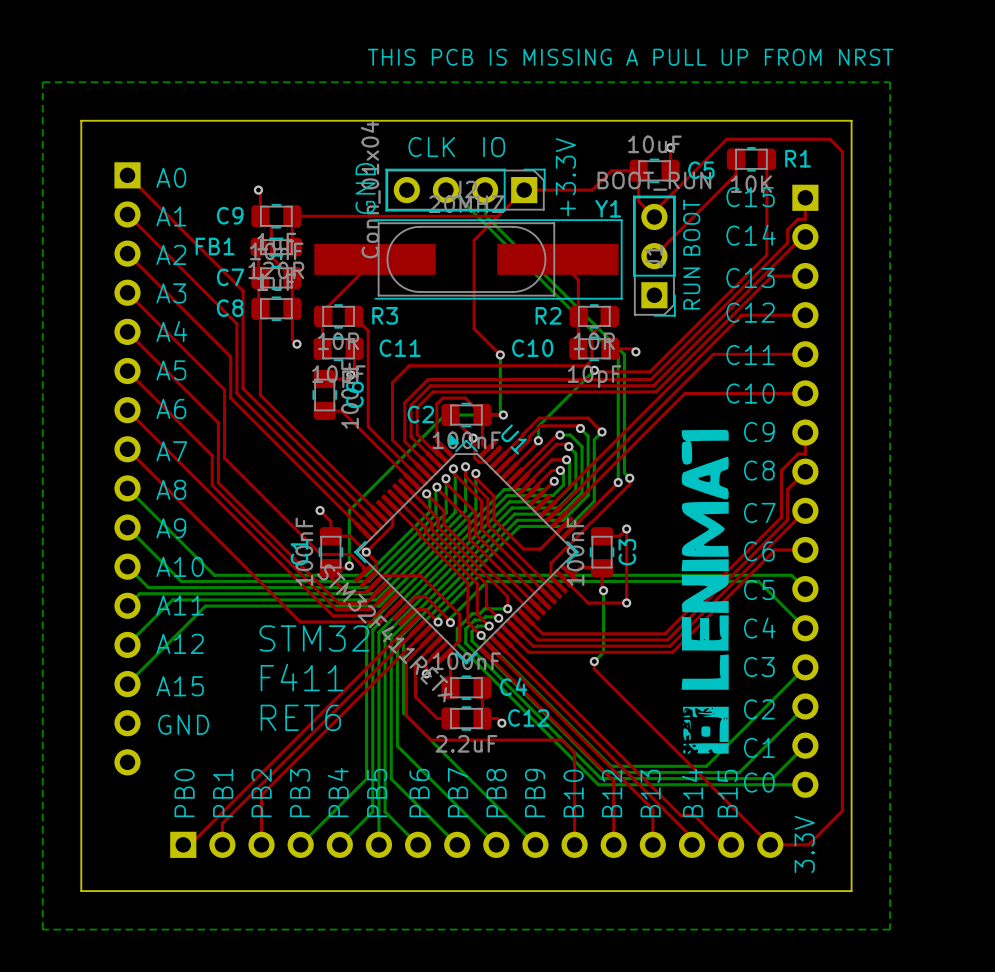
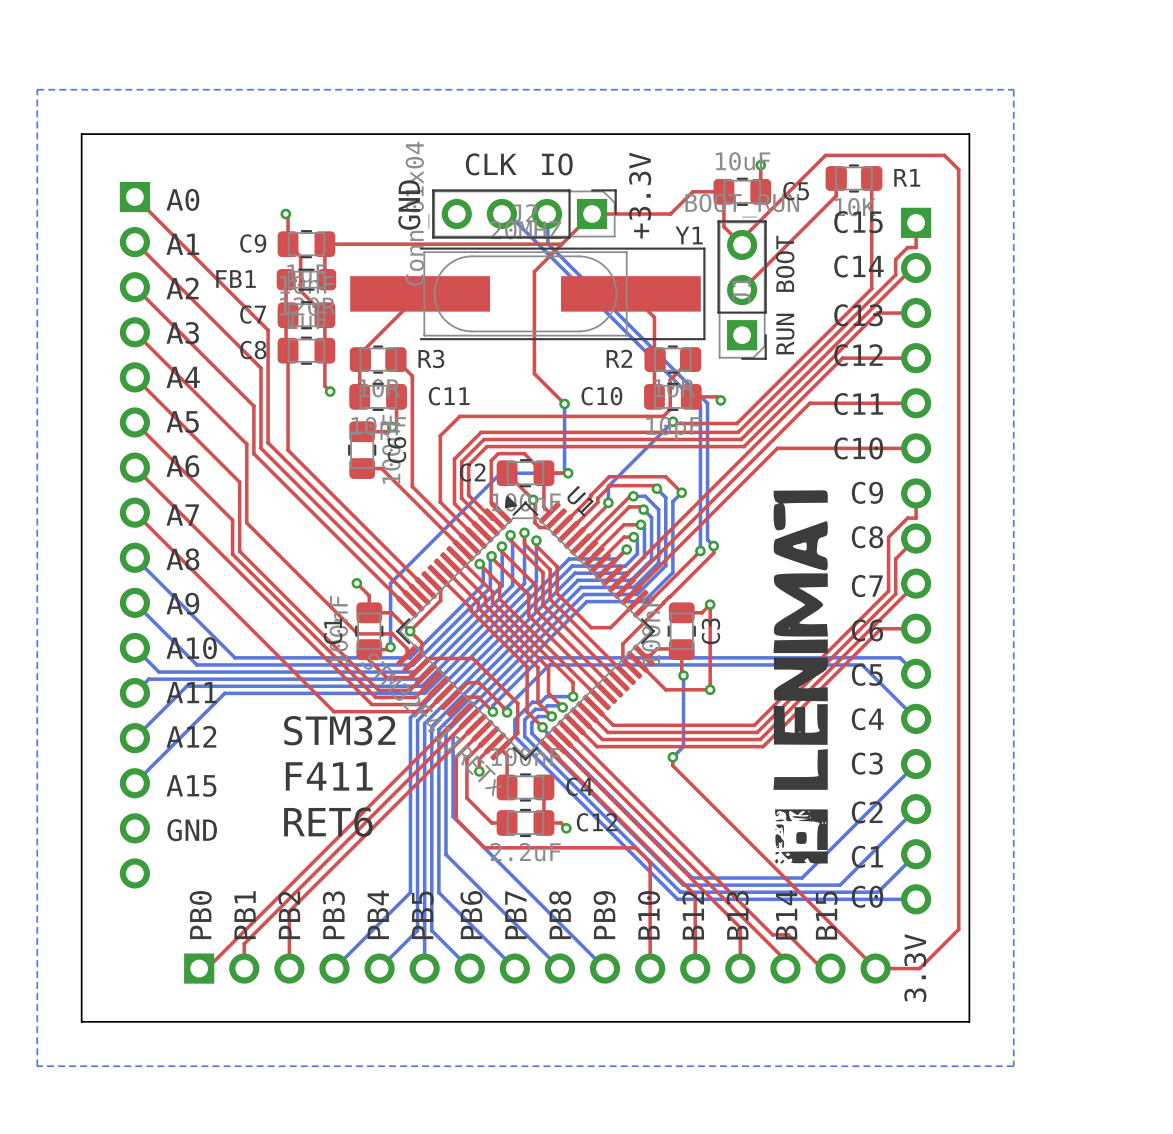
text: THIS PCB IS MISSING A PULL UP FROM NRST (630, 57) -> none

